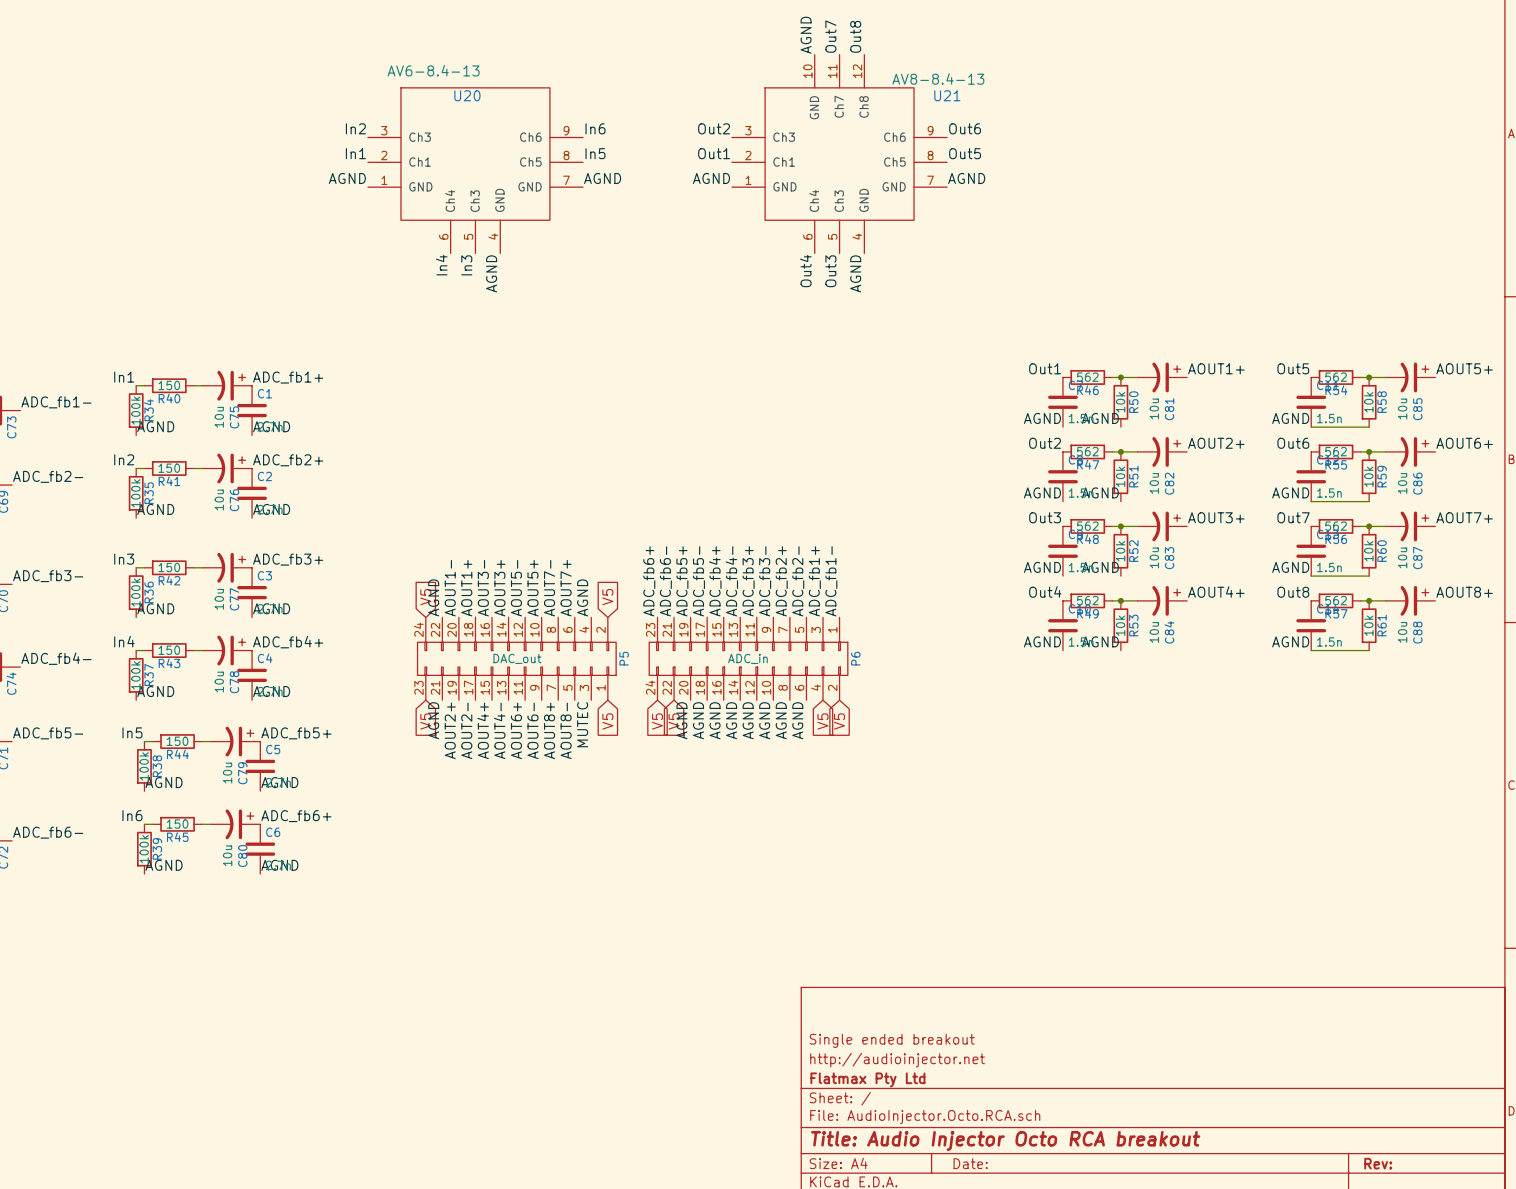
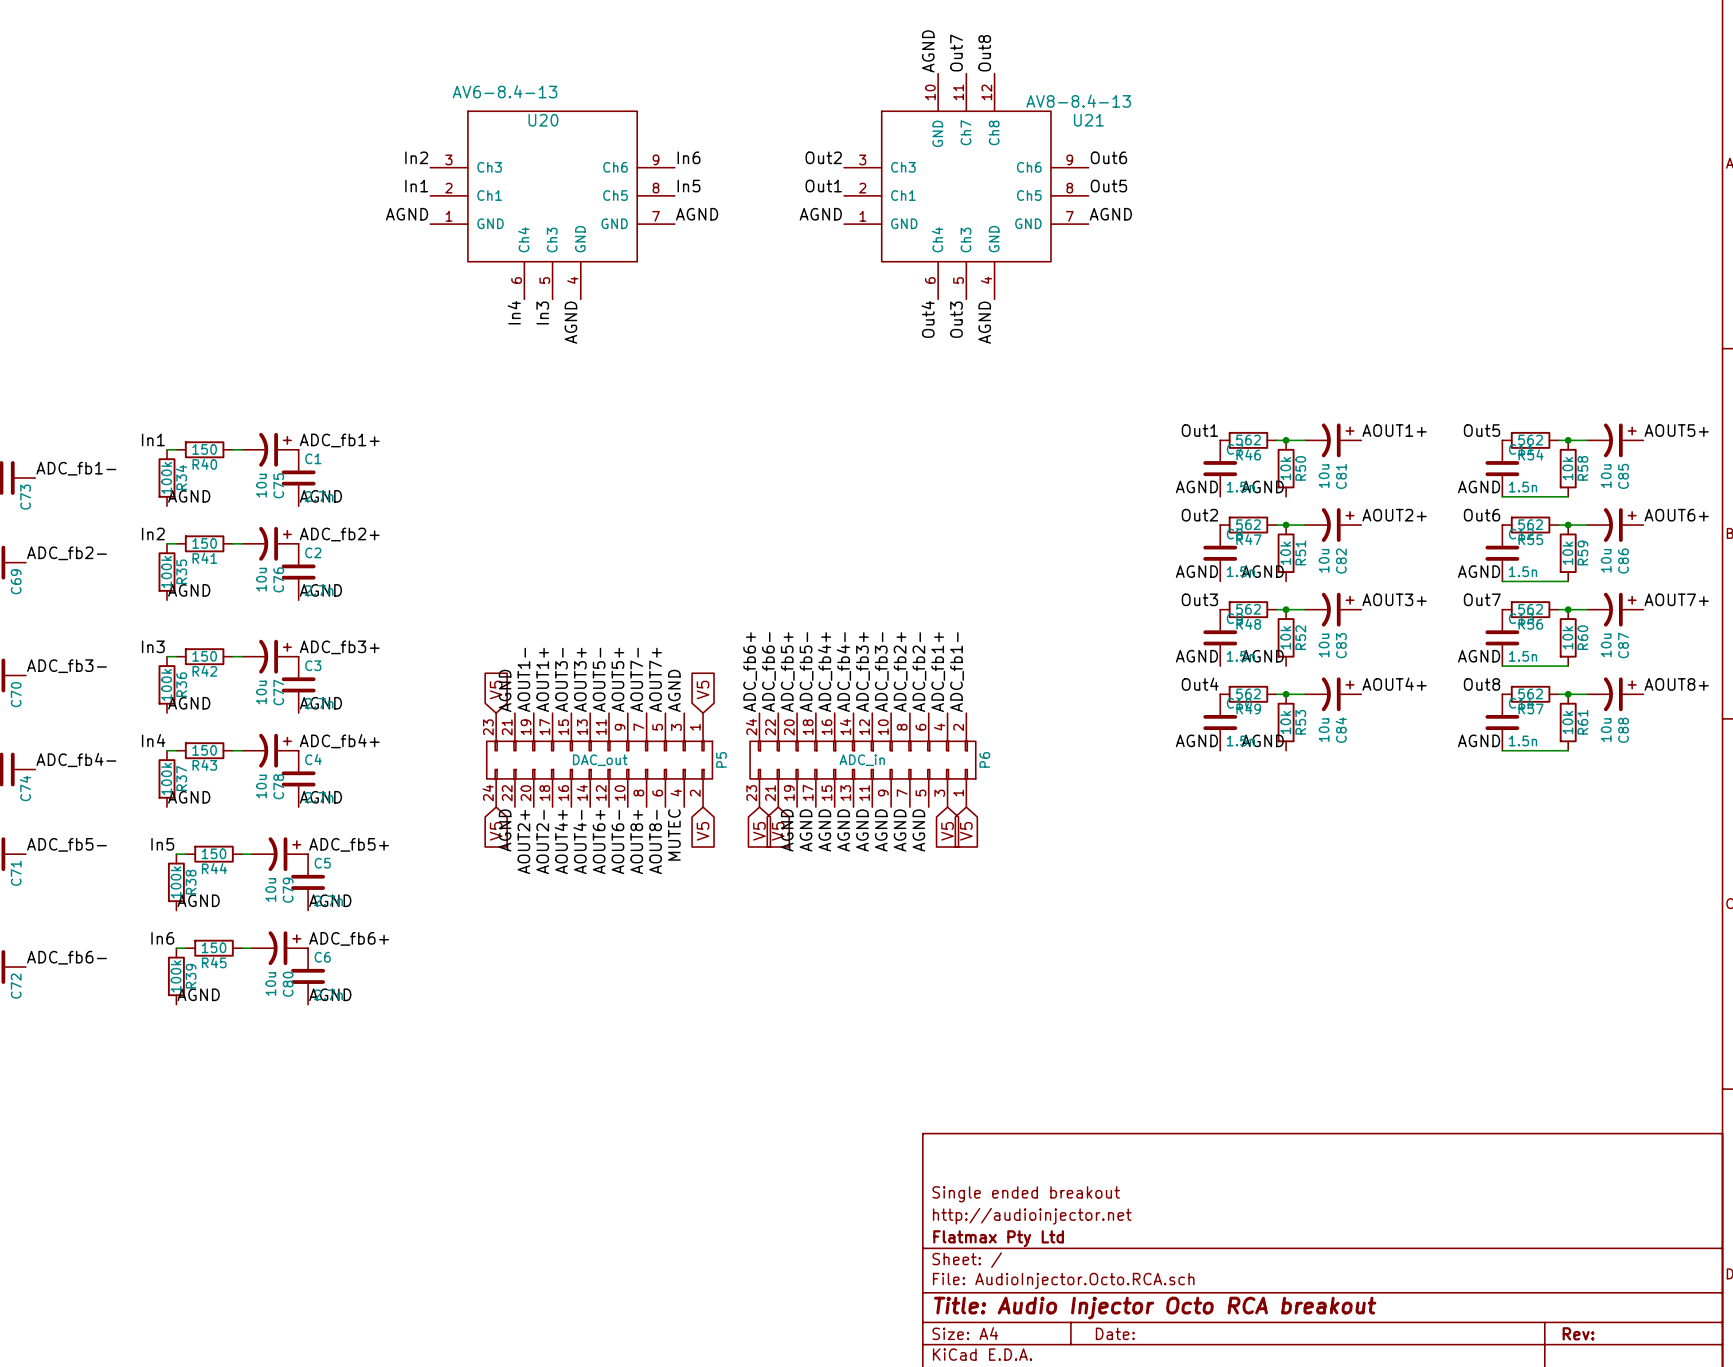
P5 flip: as is (516, 658) -> up-down (599, 760)
P6 flip: as is (748, 658) -> up-down (862, 760)

